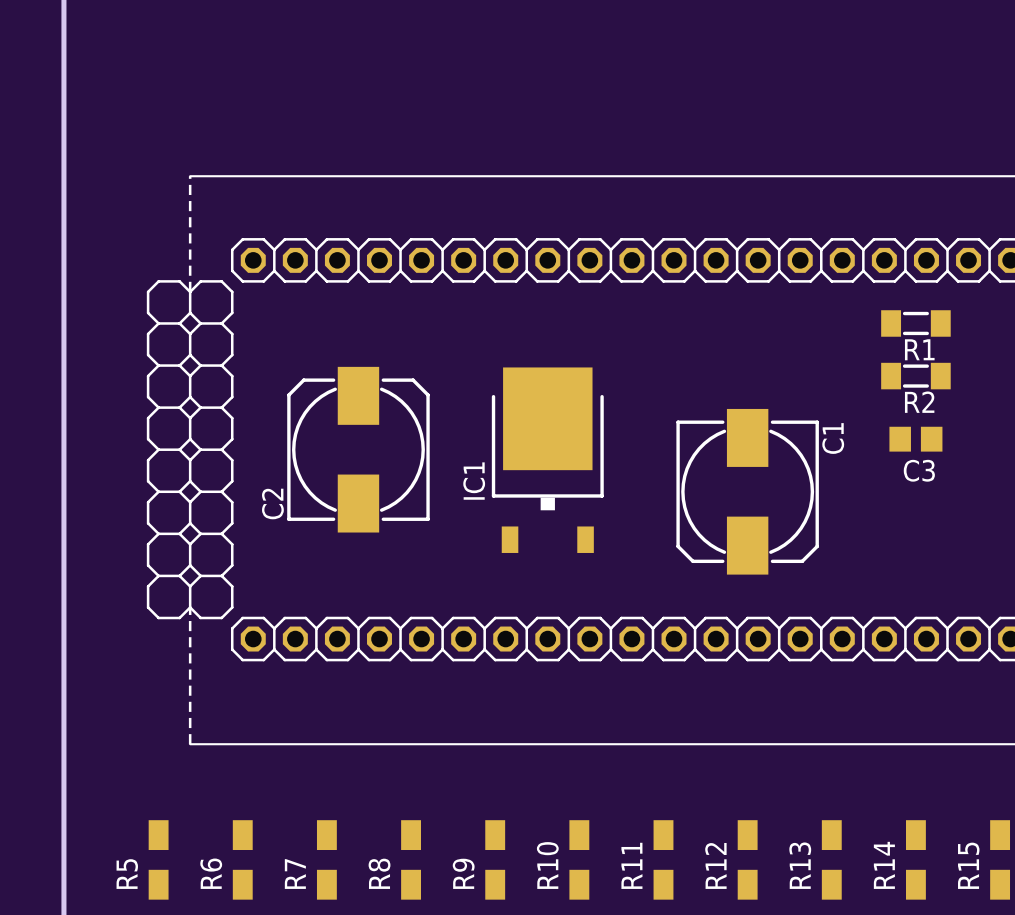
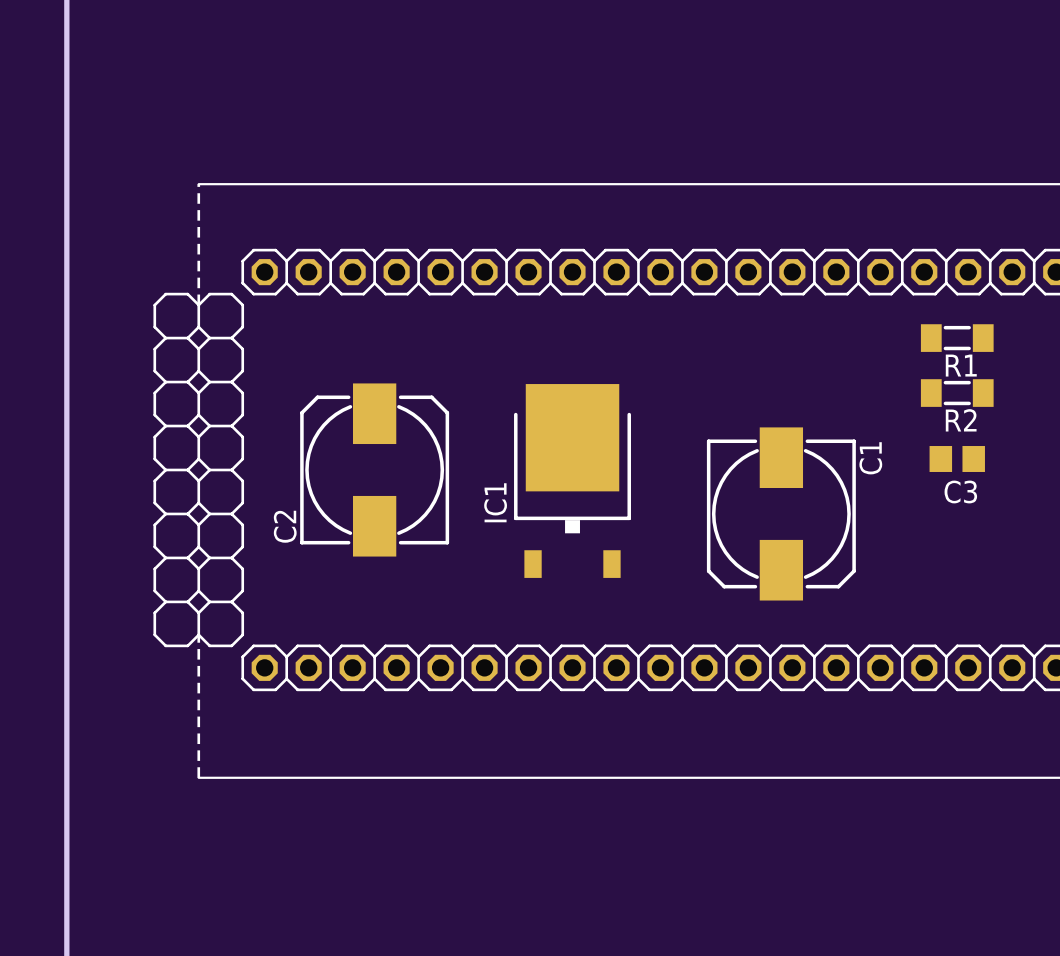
R5: (158, 859) -> none
R6: (242, 859) -> none
R7: (326, 859) -> none
R8: (411, 859) -> none
R9: (495, 859) -> none
R10: (579, 859) -> none
R11: (663, 859) -> none
R12: (747, 859) -> none
R13: (831, 859) -> none
R14: (915, 859) -> none
R15: (1000, 859) -> none

